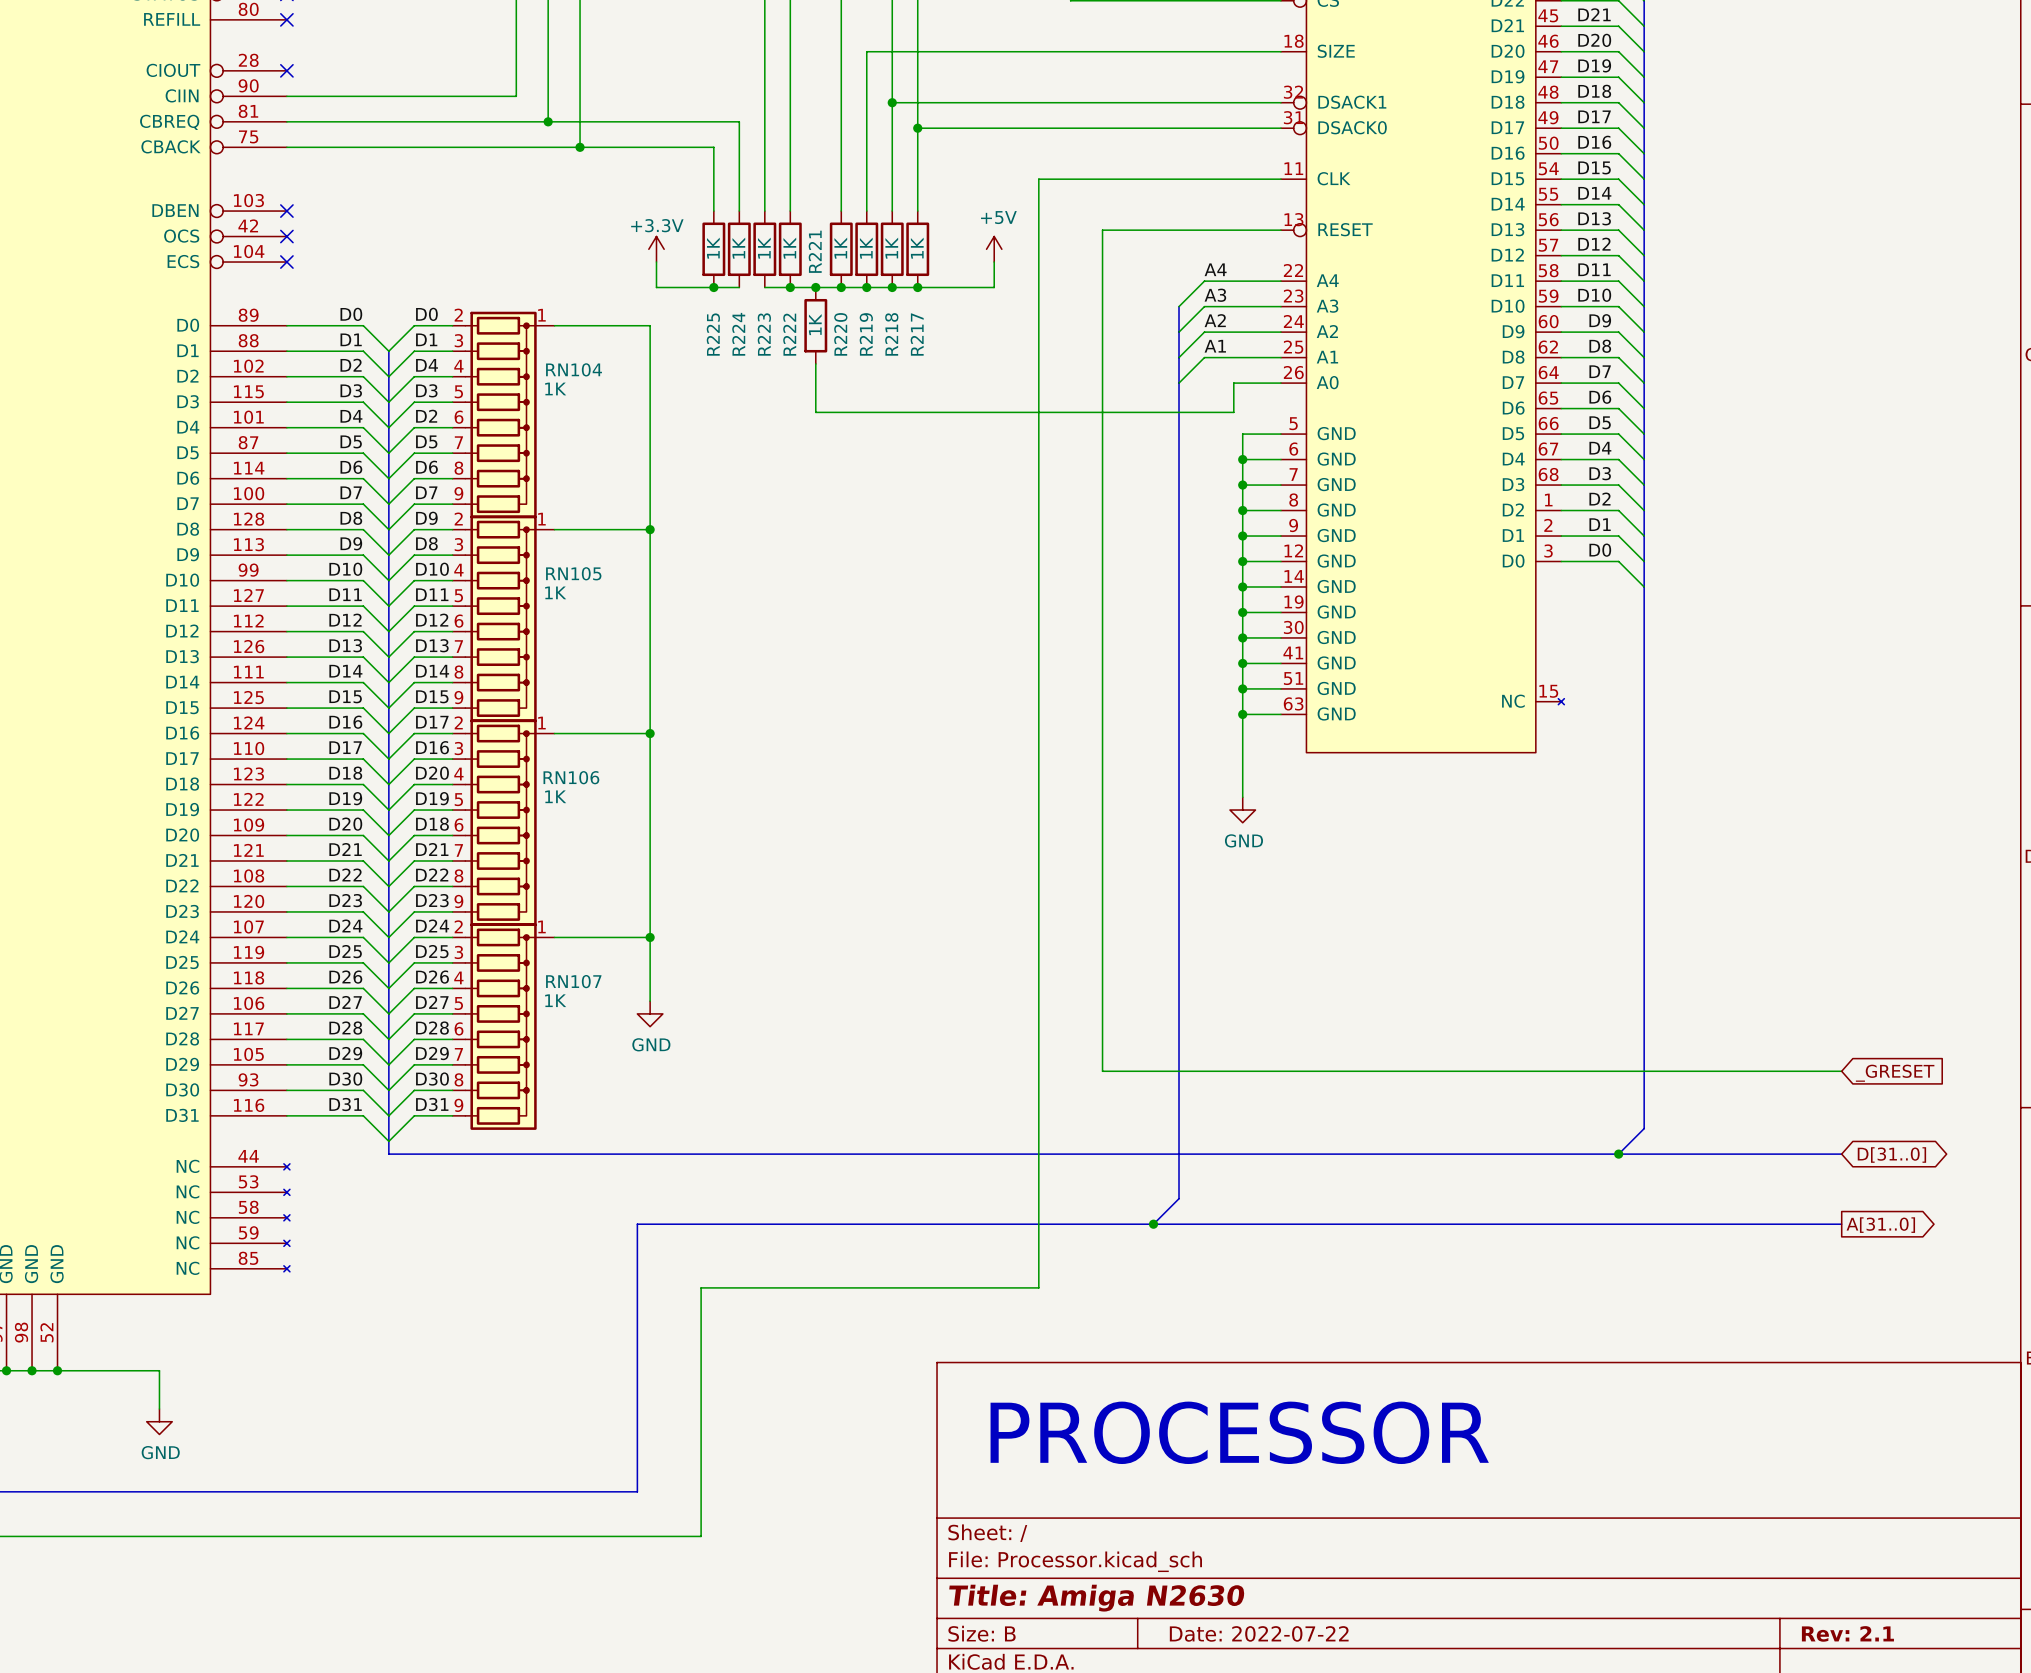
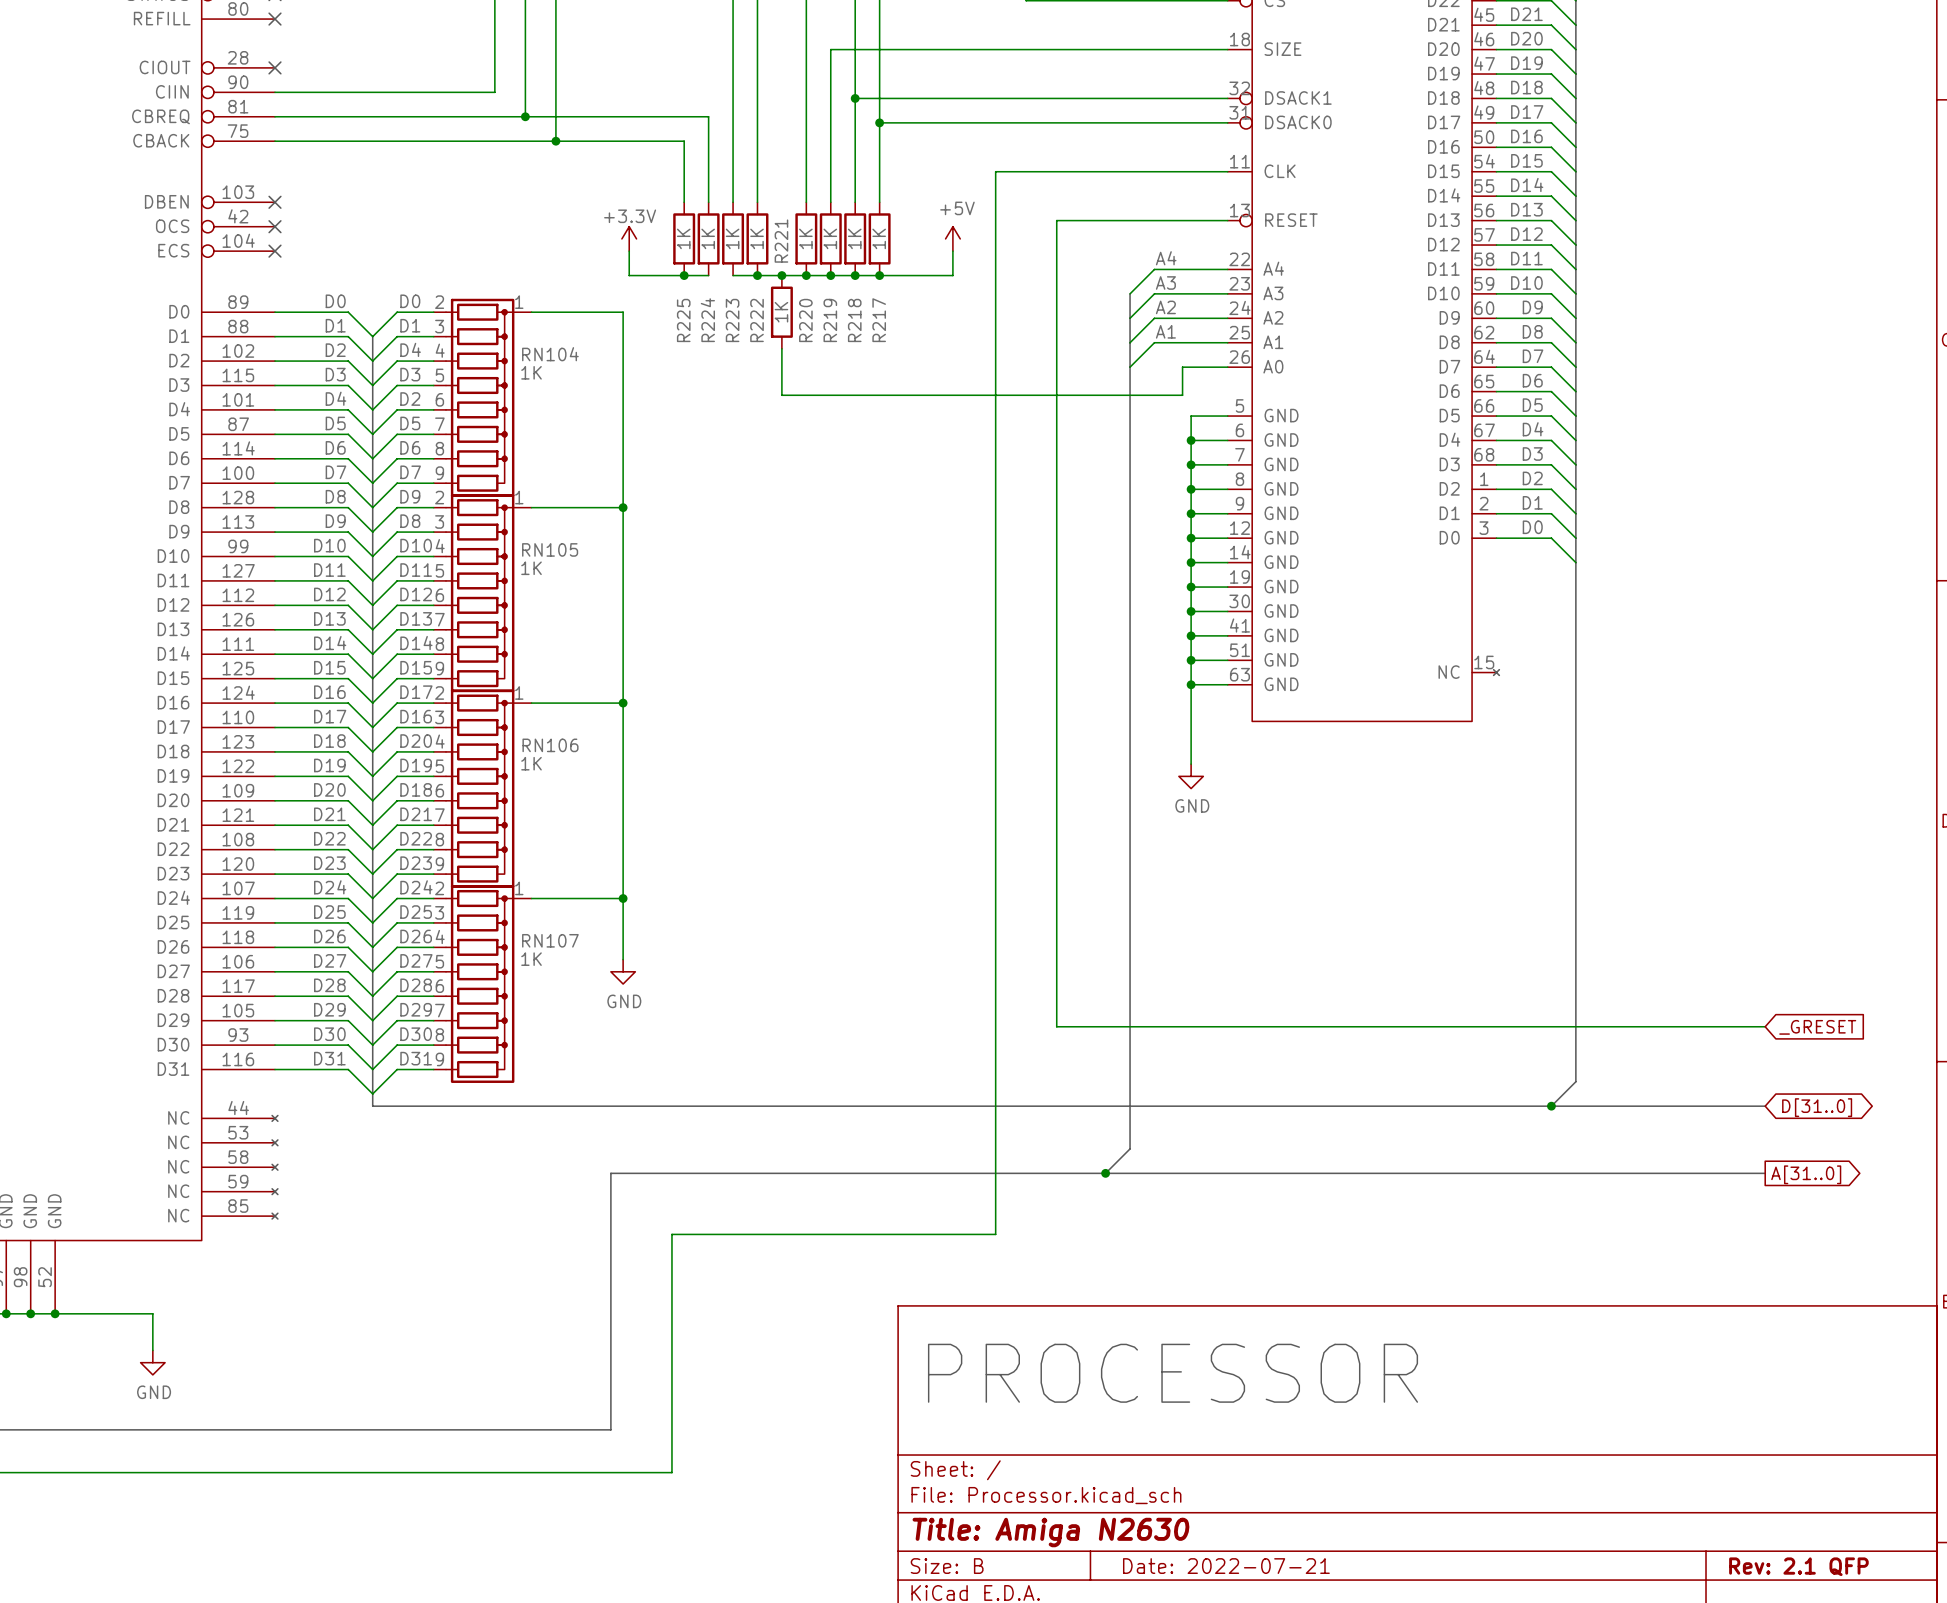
title block: Date: 2022-07-22 (1259, 1633) -> Date: 2022-07-21 (1226, 1566)
title block: Rev: 2.1 (1847, 1633) -> Rev: 2.1 QFP (1798, 1566)

